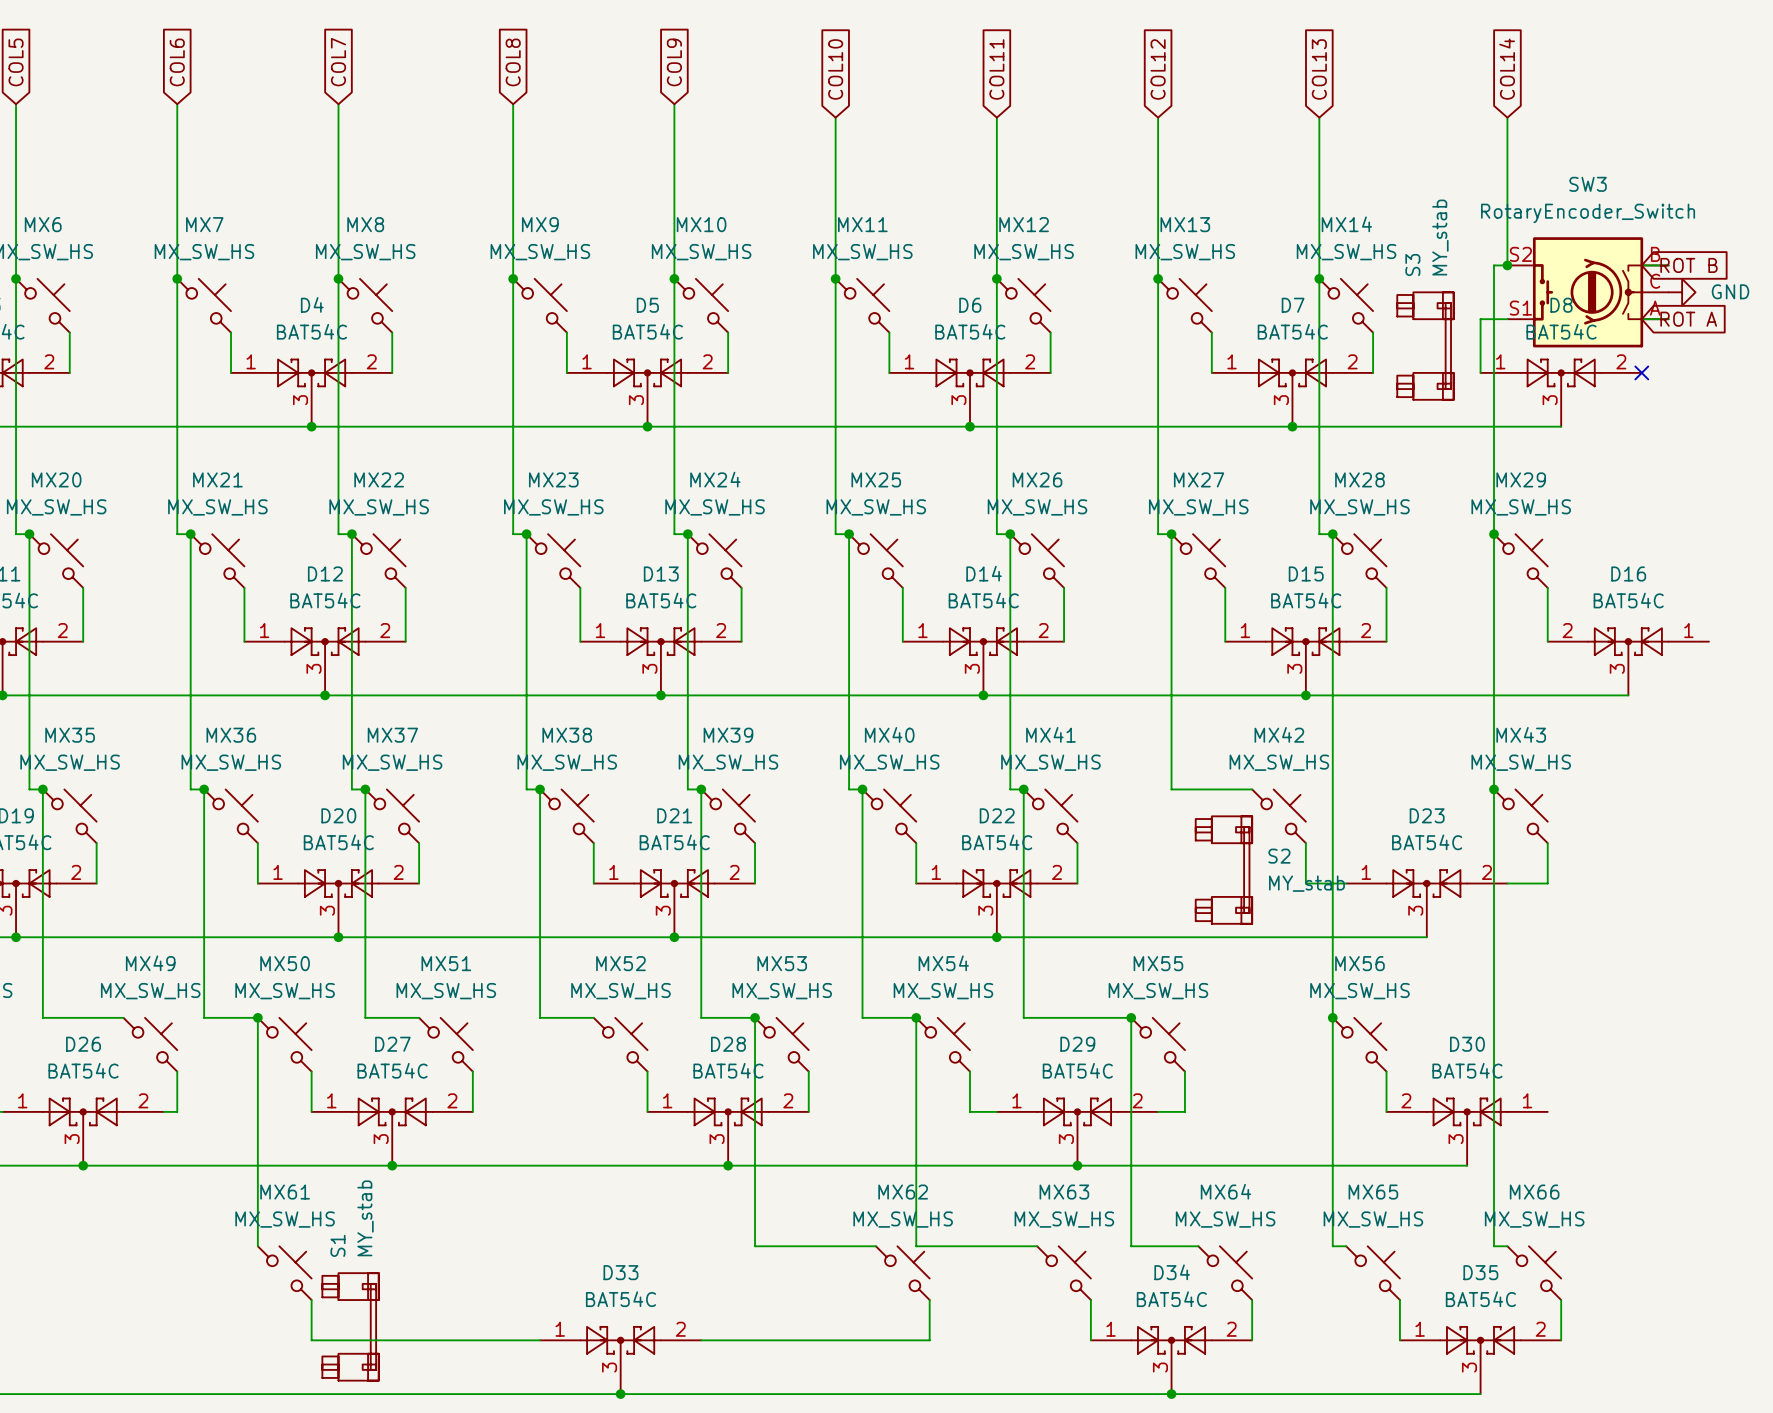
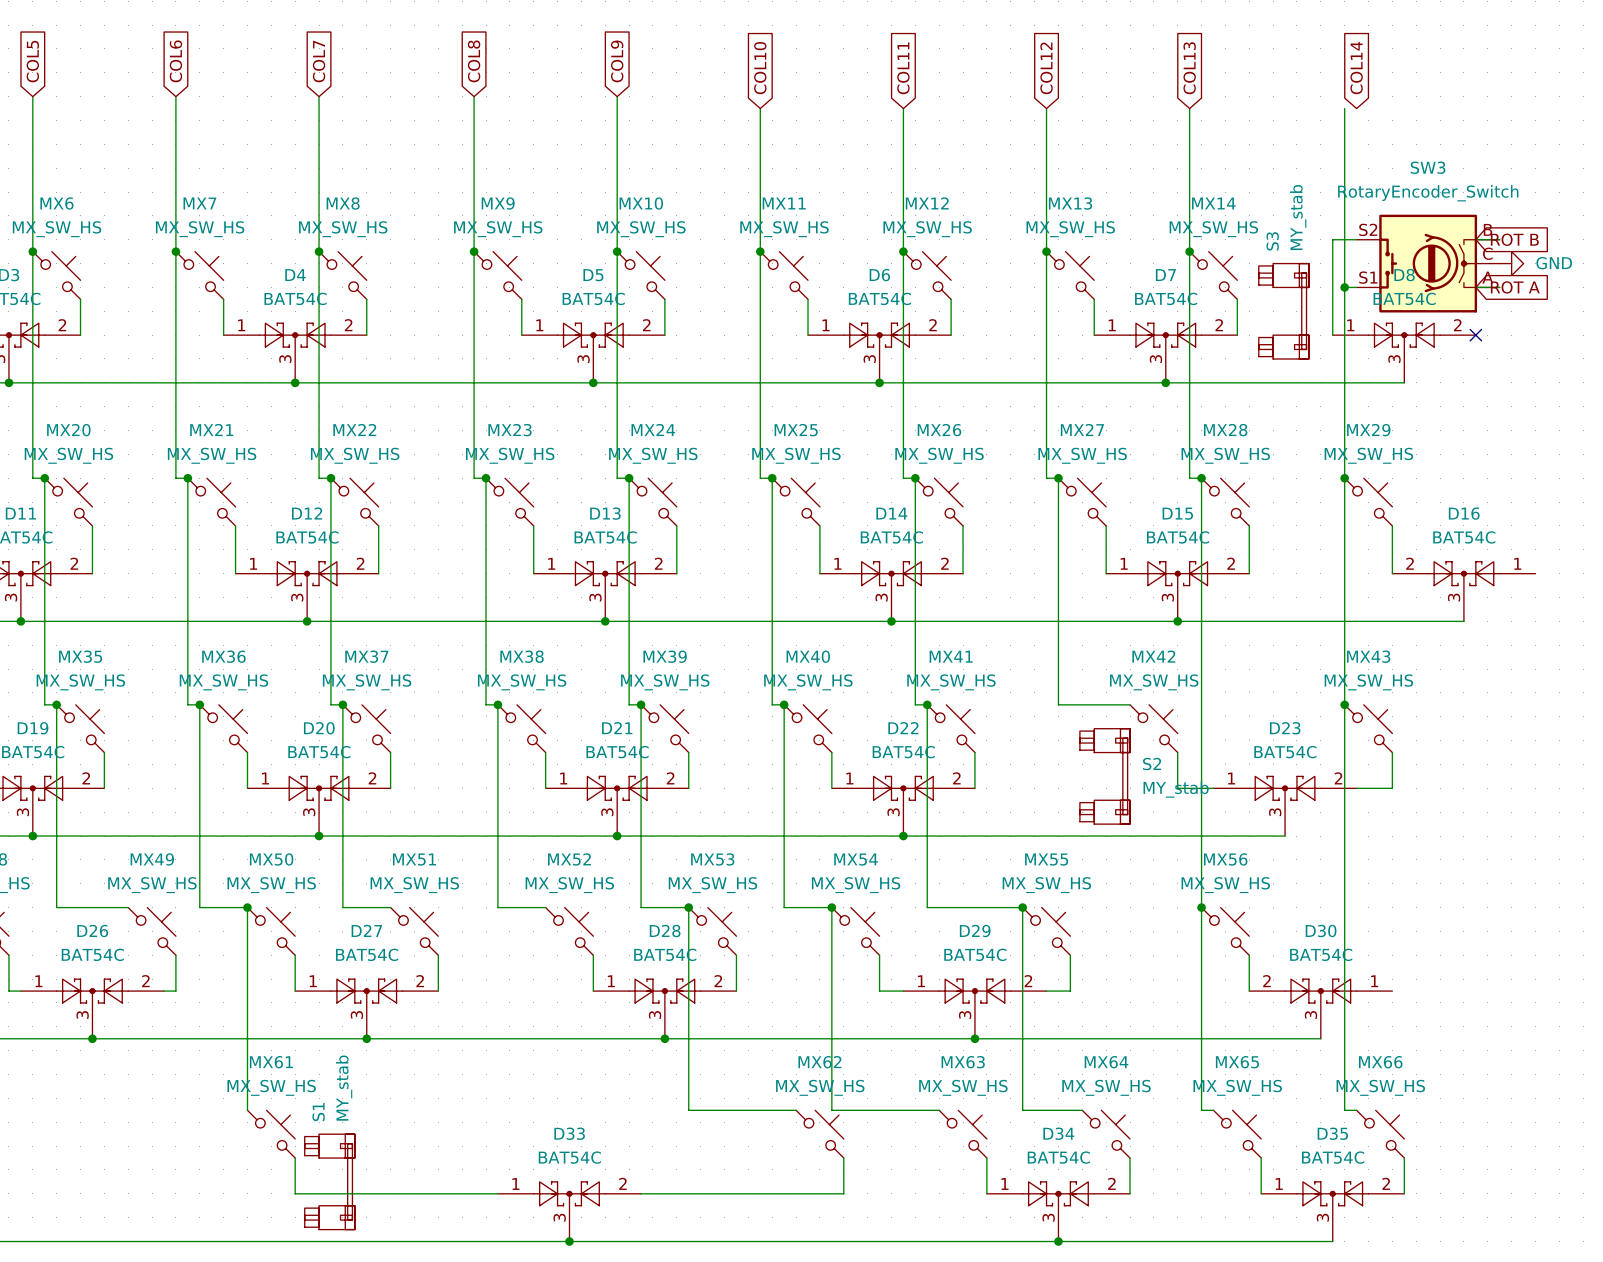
wire: (1507, 117) (1507, 265) -> none
junction position: (1507, 265) -> (1344, 287)
wire: (1480, 319) (1494, 319) -> (1332, 287) (1332, 239) (1344, 239) (1344, 108)

